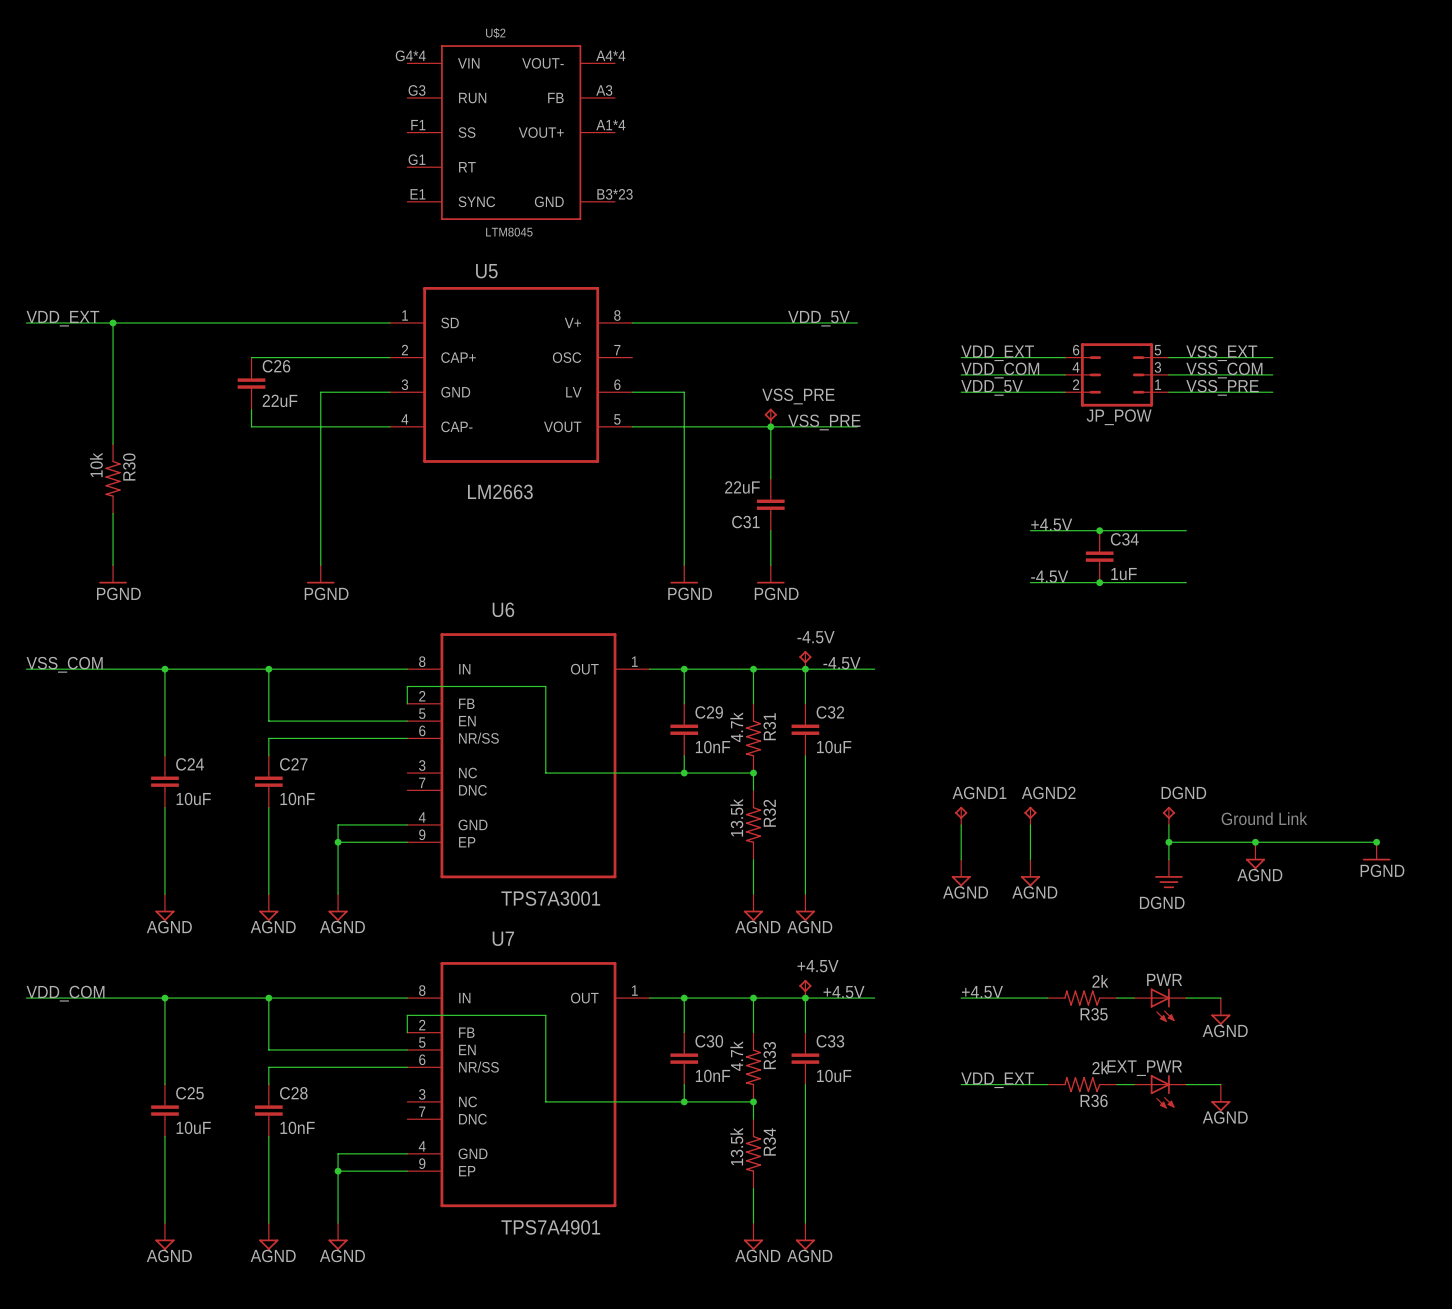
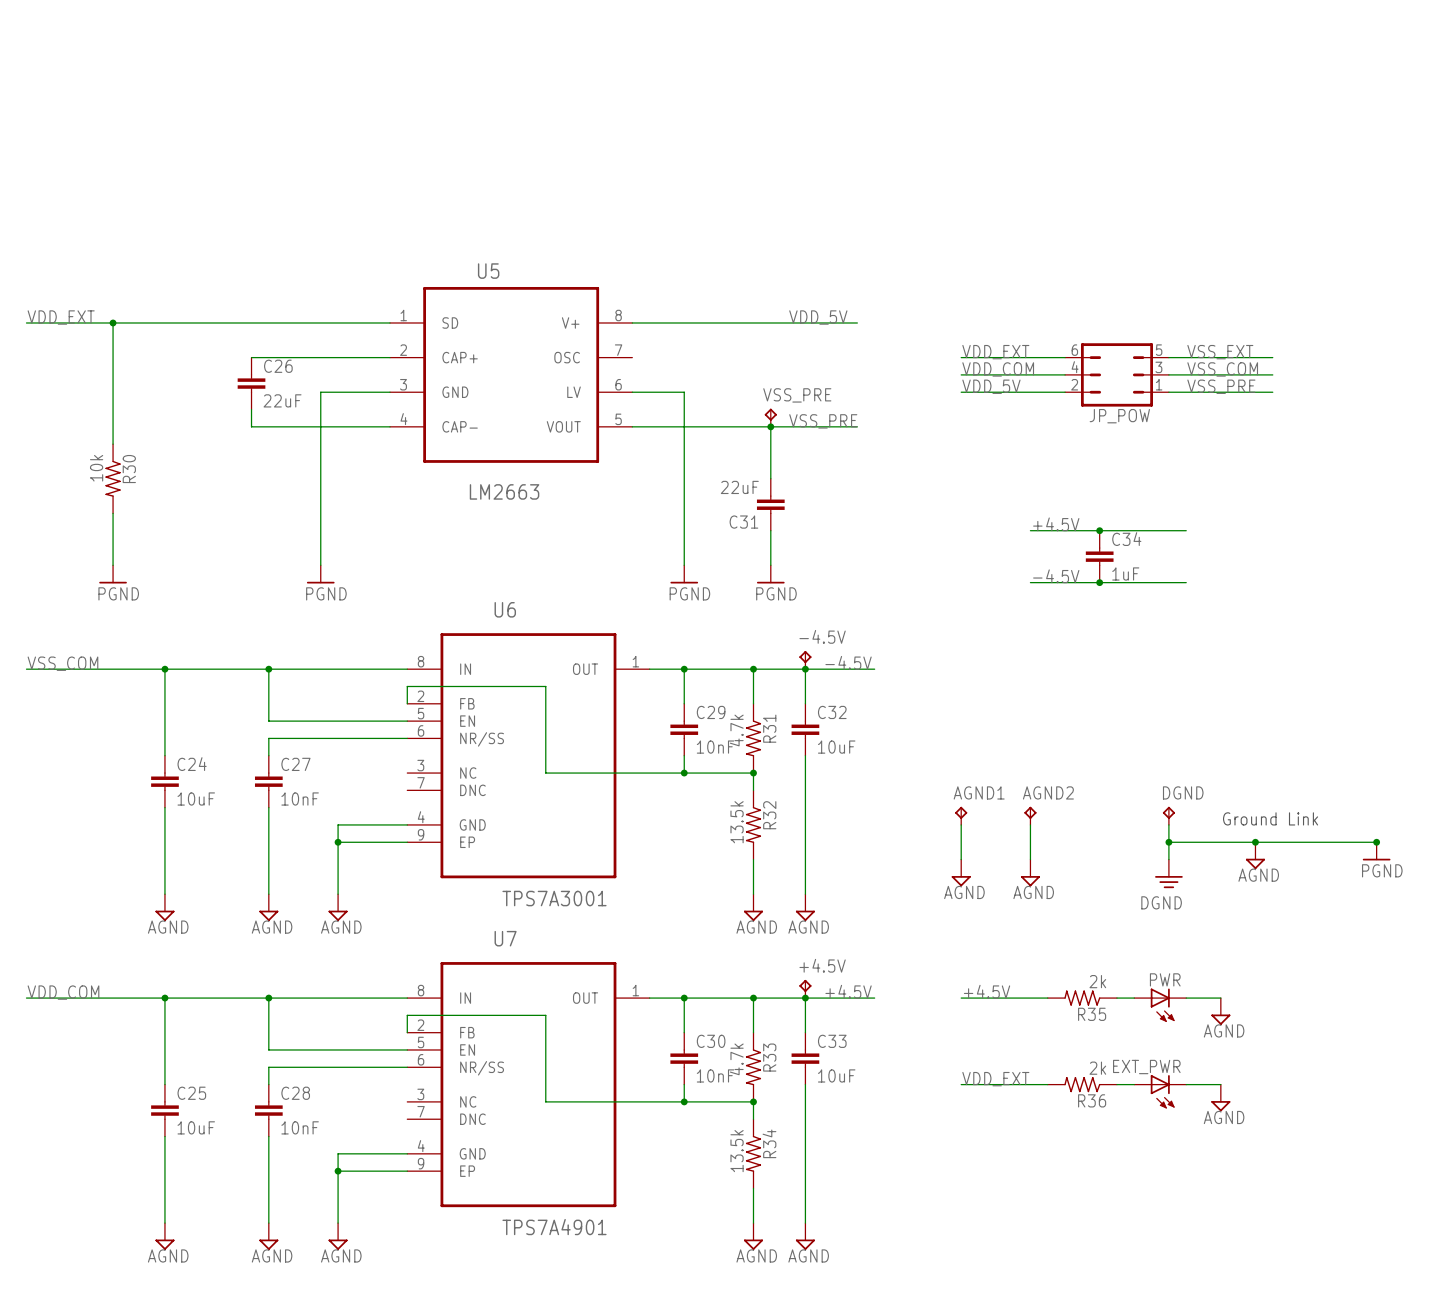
U$2: LTM8045 (511, 132) -> none

